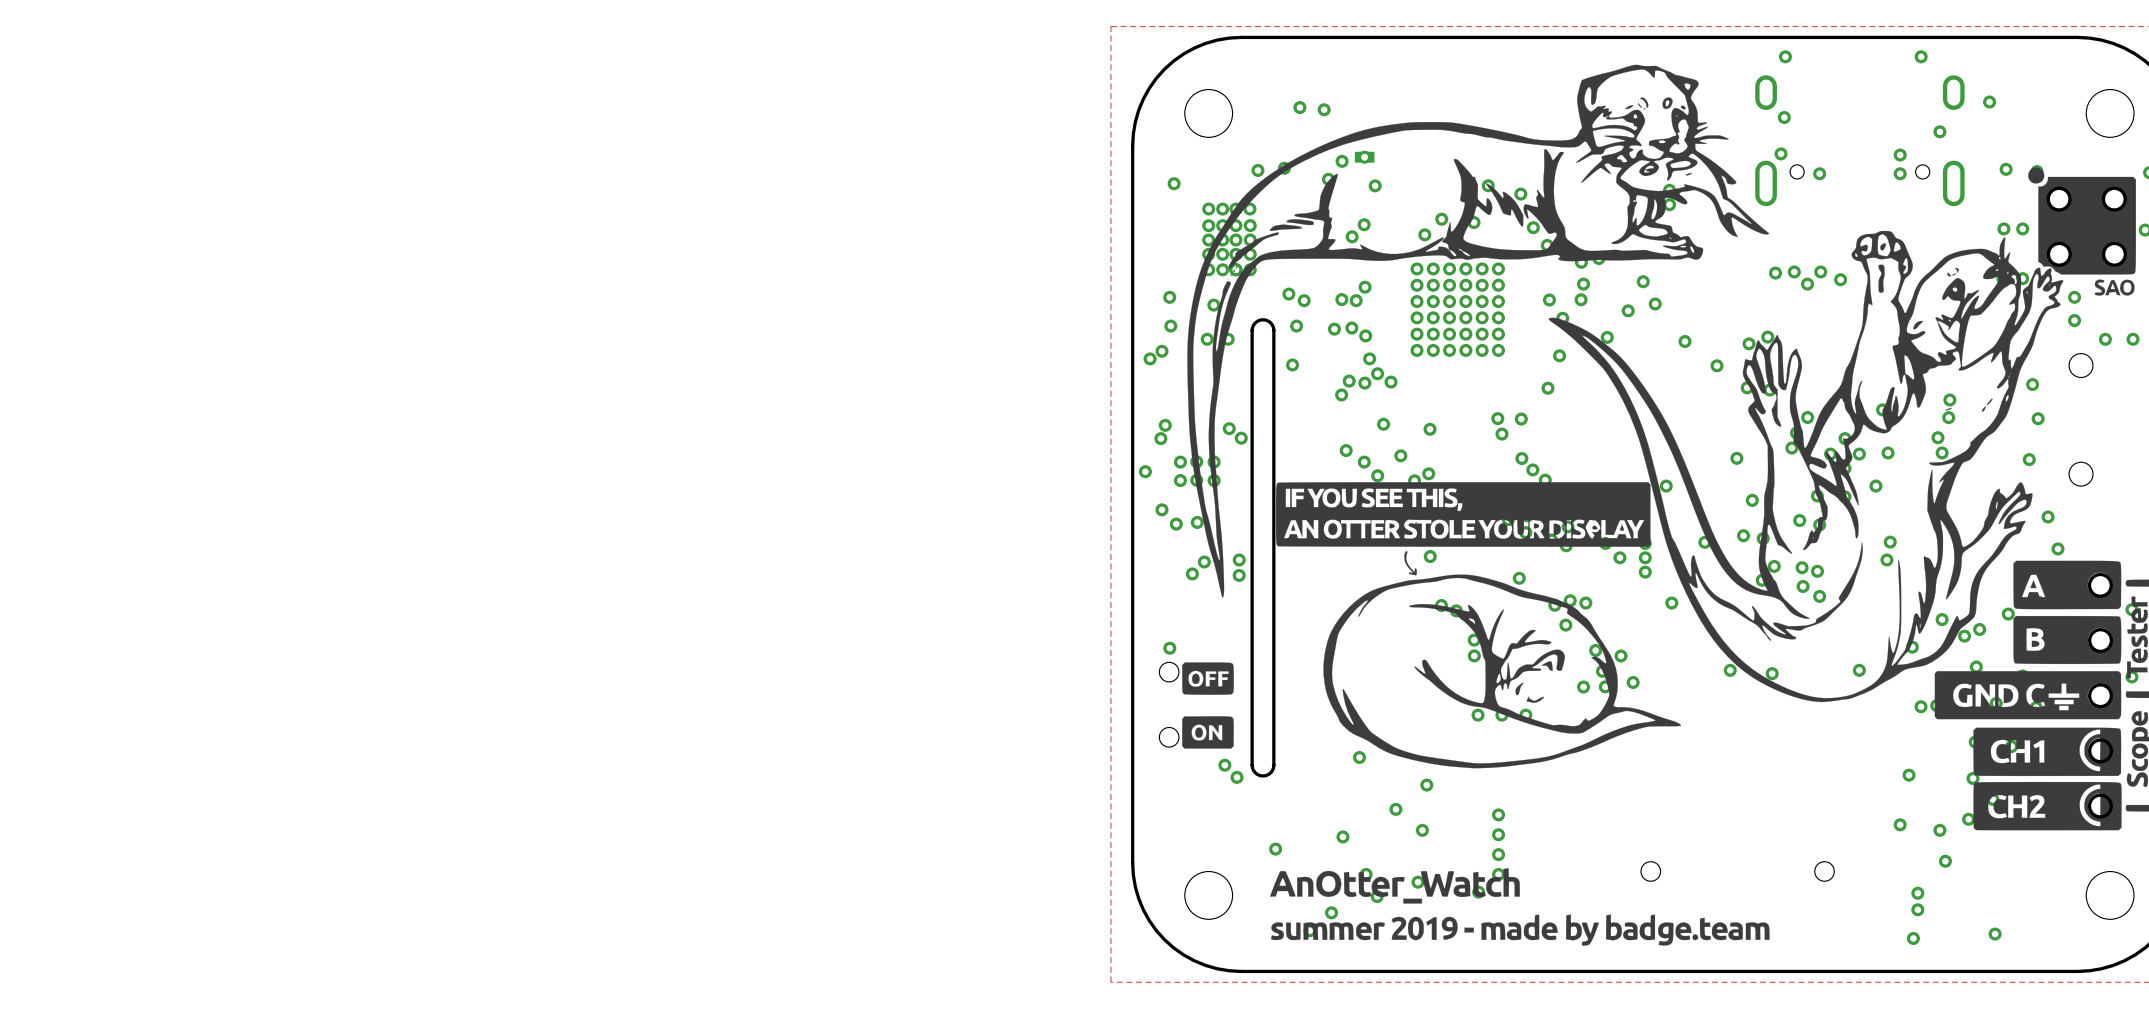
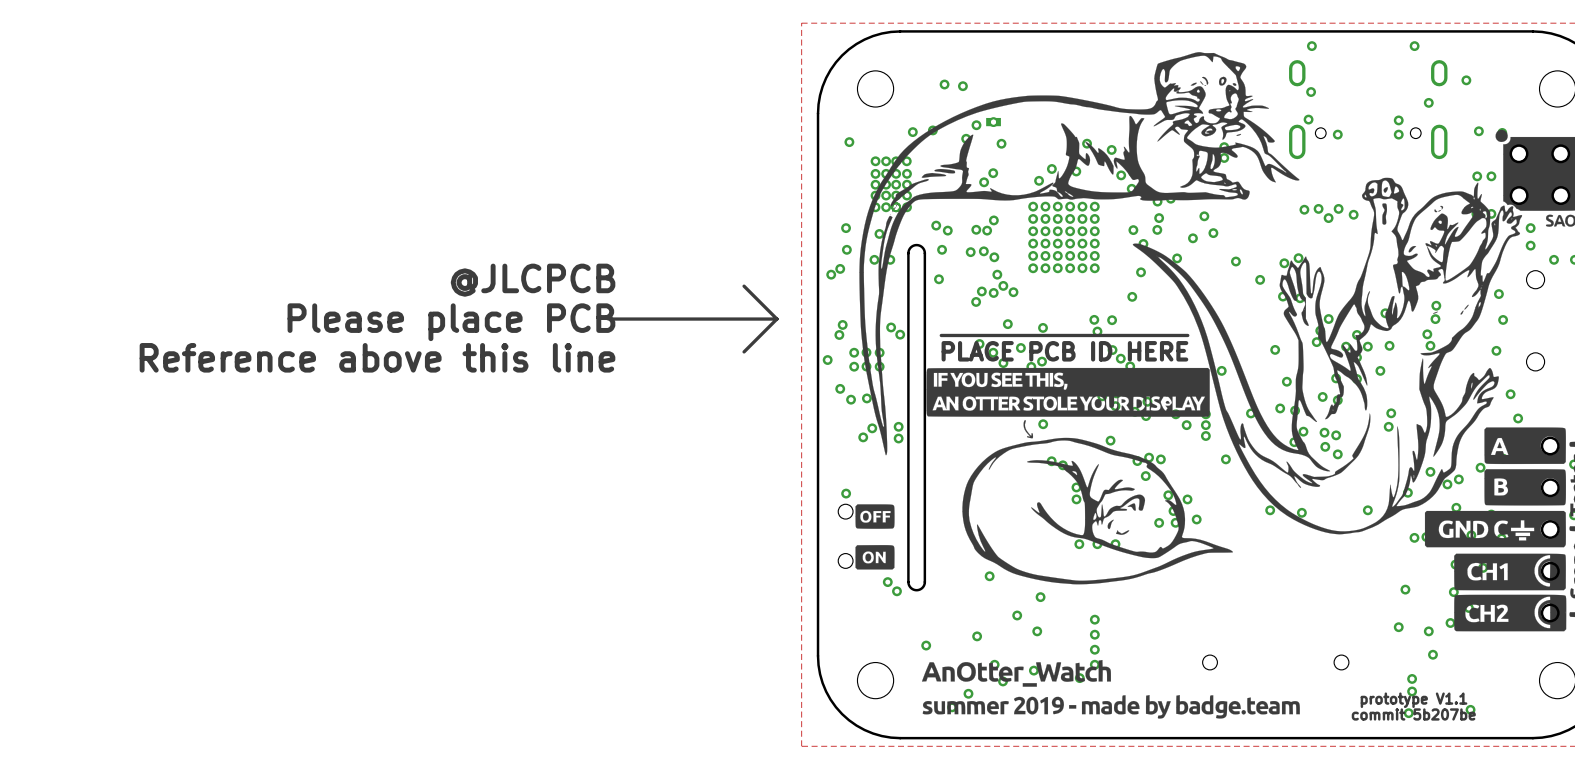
text: none -> @JLCPCB (533, 280)
line: none -> (744, 286) (776, 319)
line: none -> (612, 319) (776, 319)
line: none -> (776, 319) (744, 351)
text: none -> Please place PCB (451, 322)
line: none -> (941, 335) (1187, 335)
text: none -> PLACE PCB ID HERE (1064, 351)
text: none -> Reference above this line (377, 357)
text: none -> prototype V1.1 (1414, 700)
text: none -> commit 5b207be (1413, 714)

